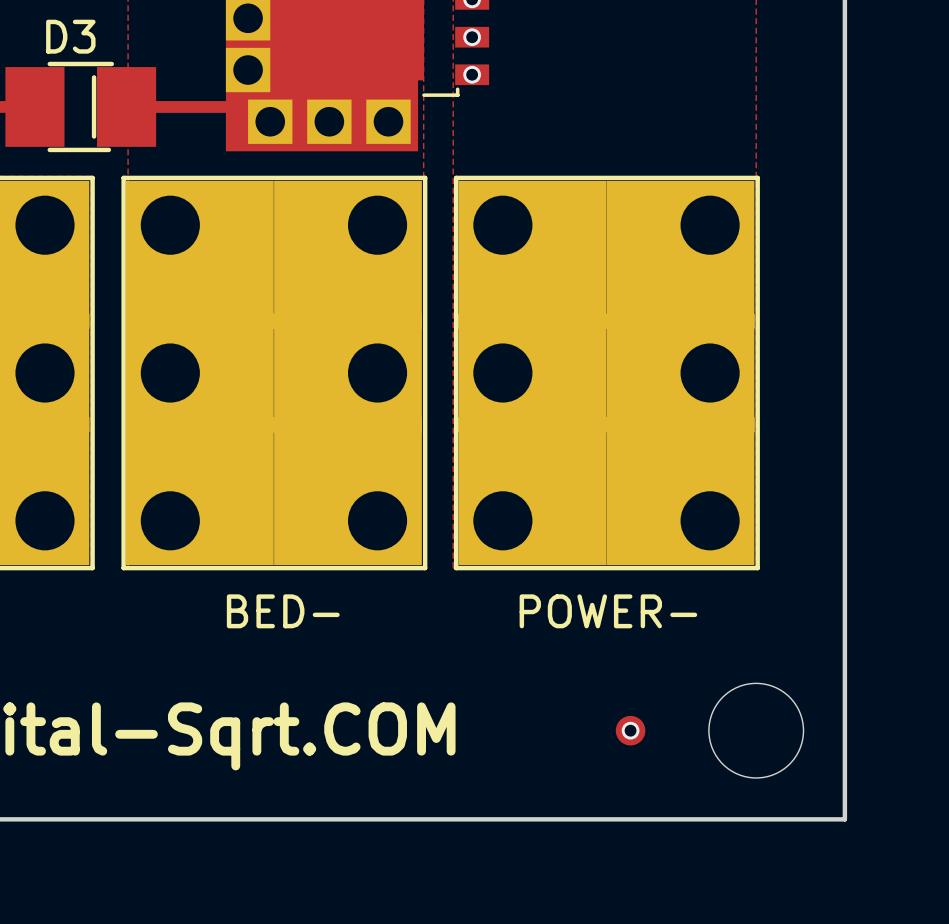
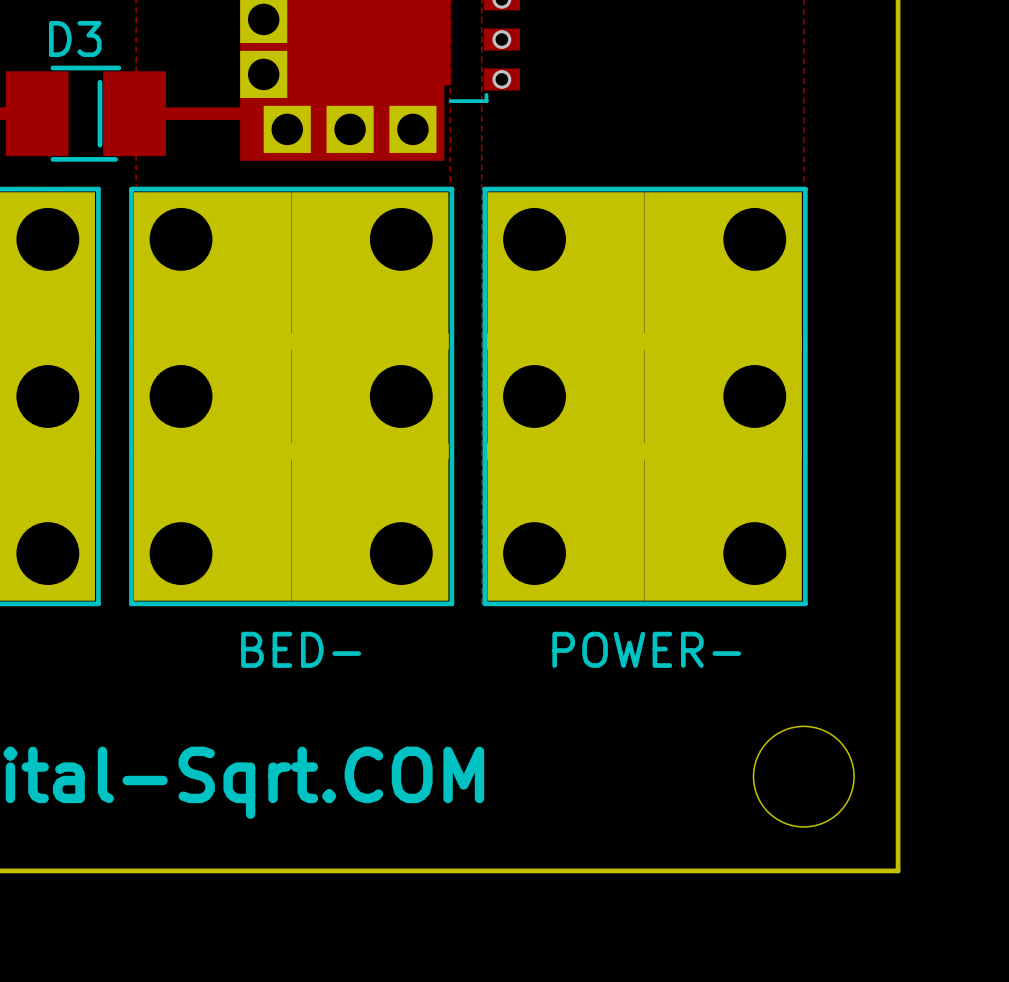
part: (630, 730) -> none
via: (630, 730) -> none

